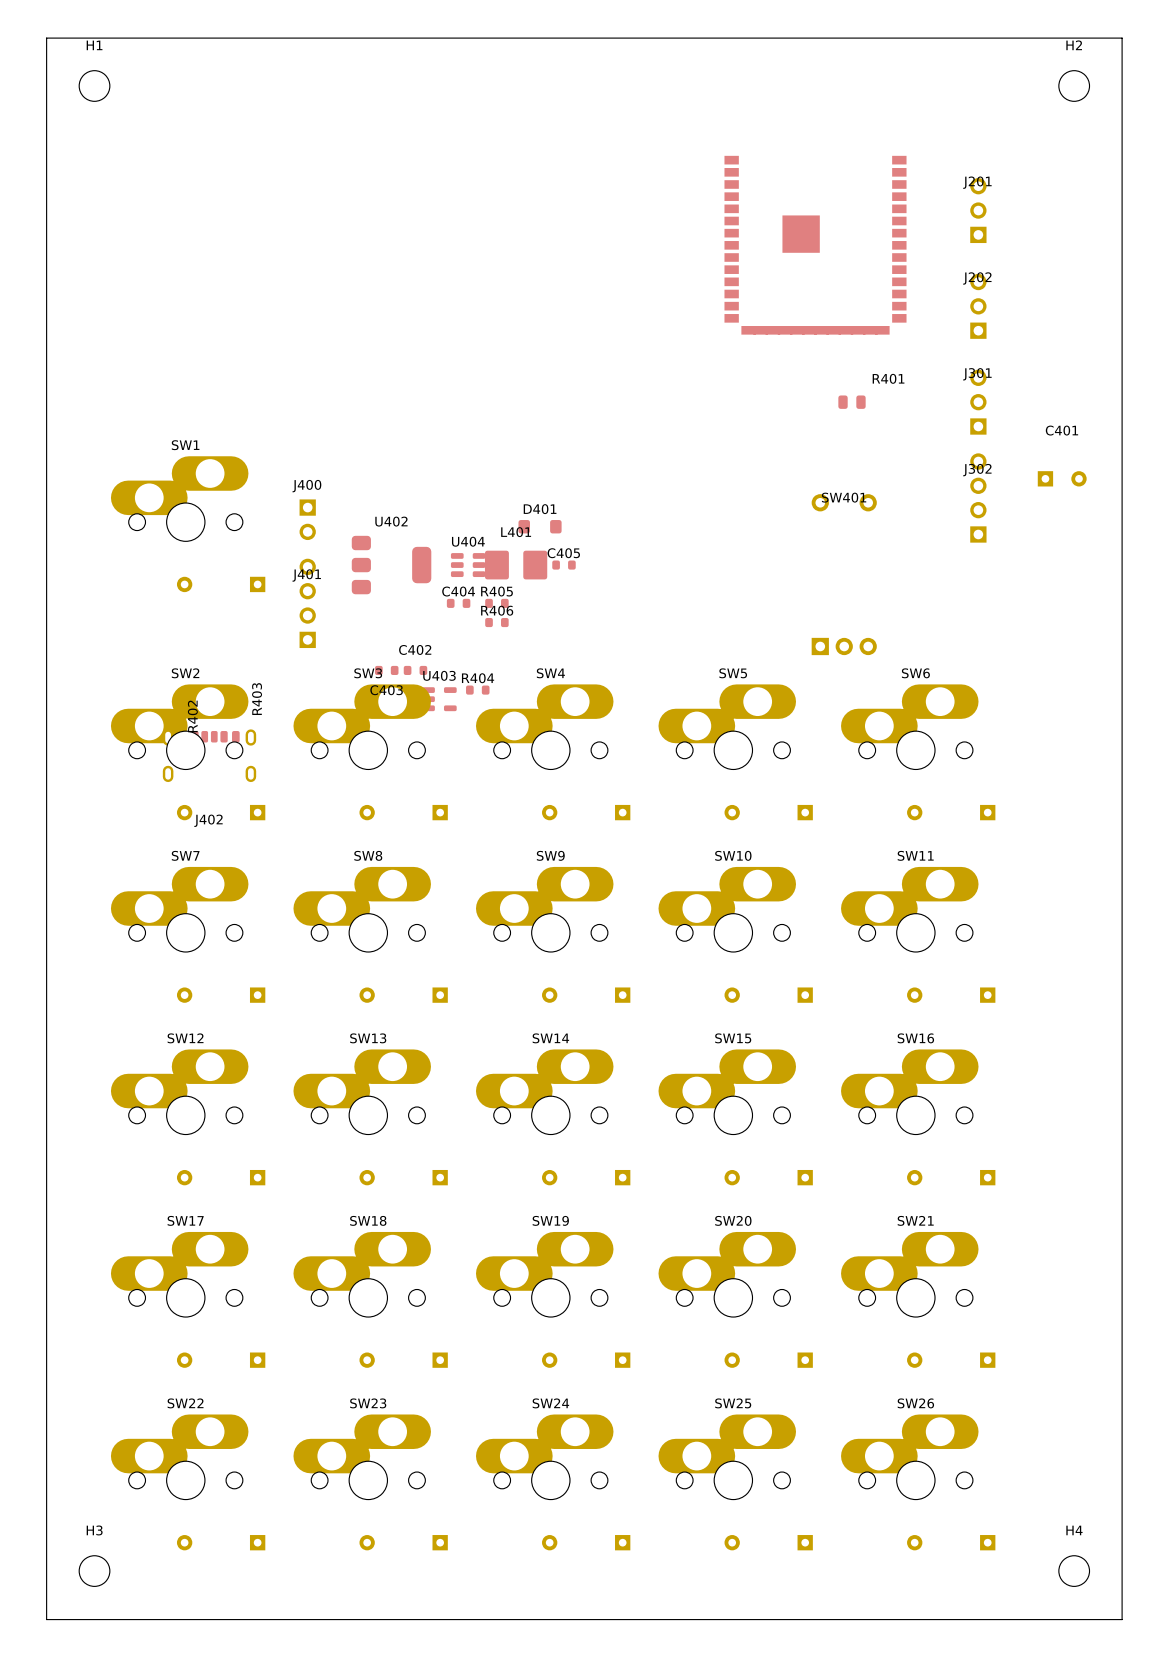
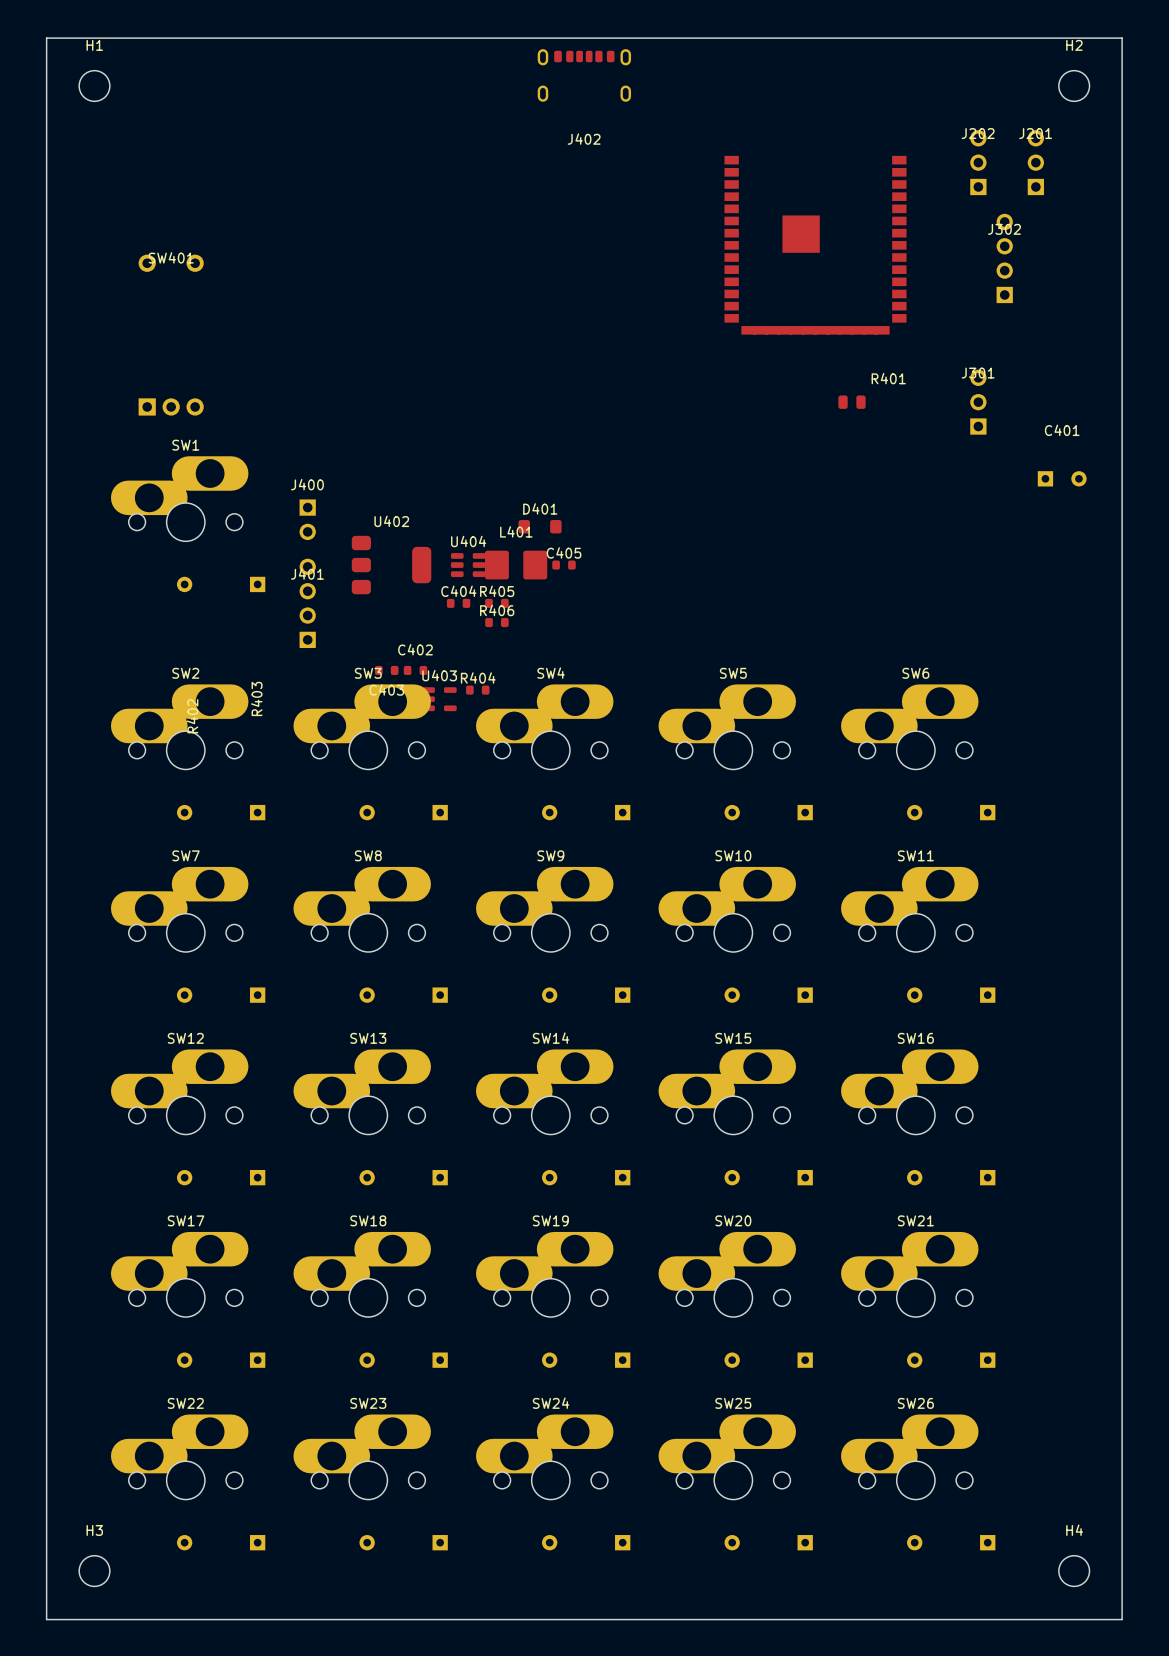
J201 position: (978, 210) -> (1035, 162)
J202 position: (978, 306) -> (978, 162)
J302 position: (978, 497) -> (1004, 258)
SW401 position: (844, 574) -> (171, 335)
J402 position: (209, 755) -> (584, 75)

